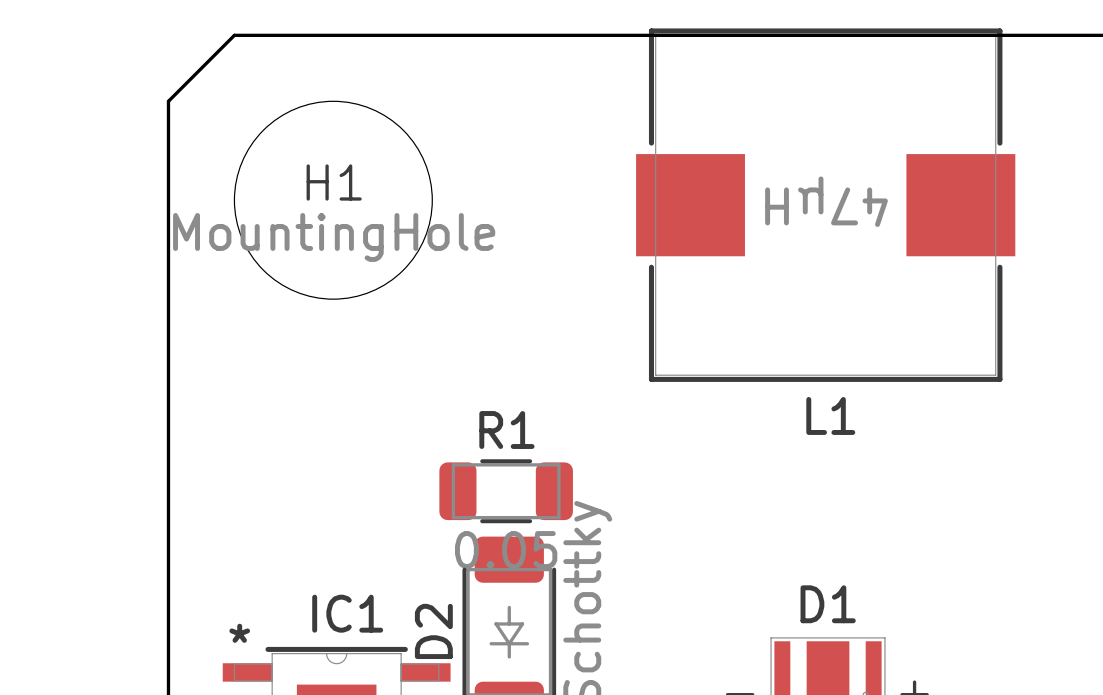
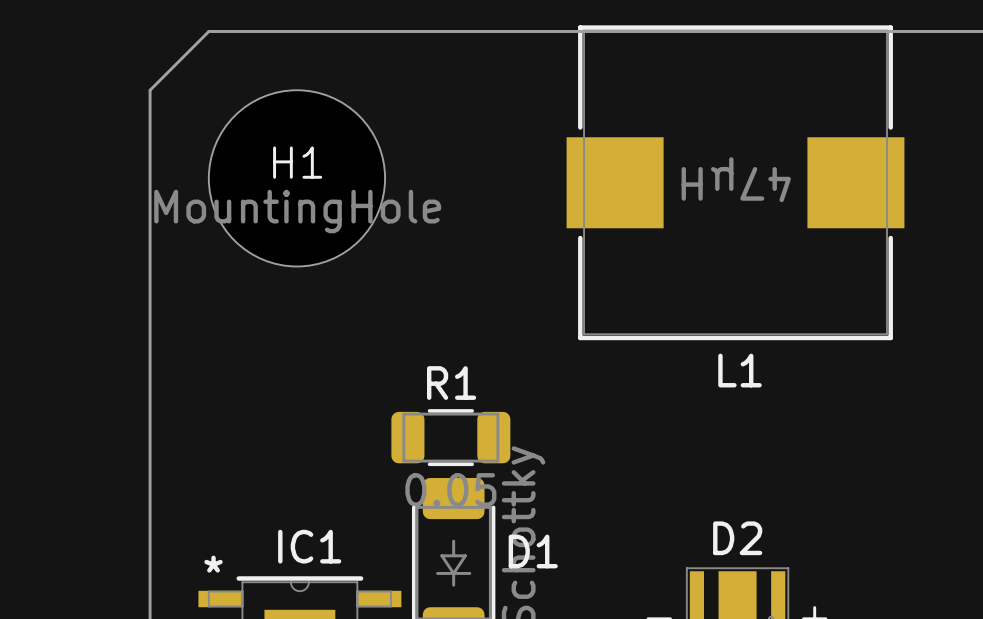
D1 name: D1 (828, 604) -> D2 (737, 538)
D2 name: D2 (433, 631) -> D1 (533, 551)

